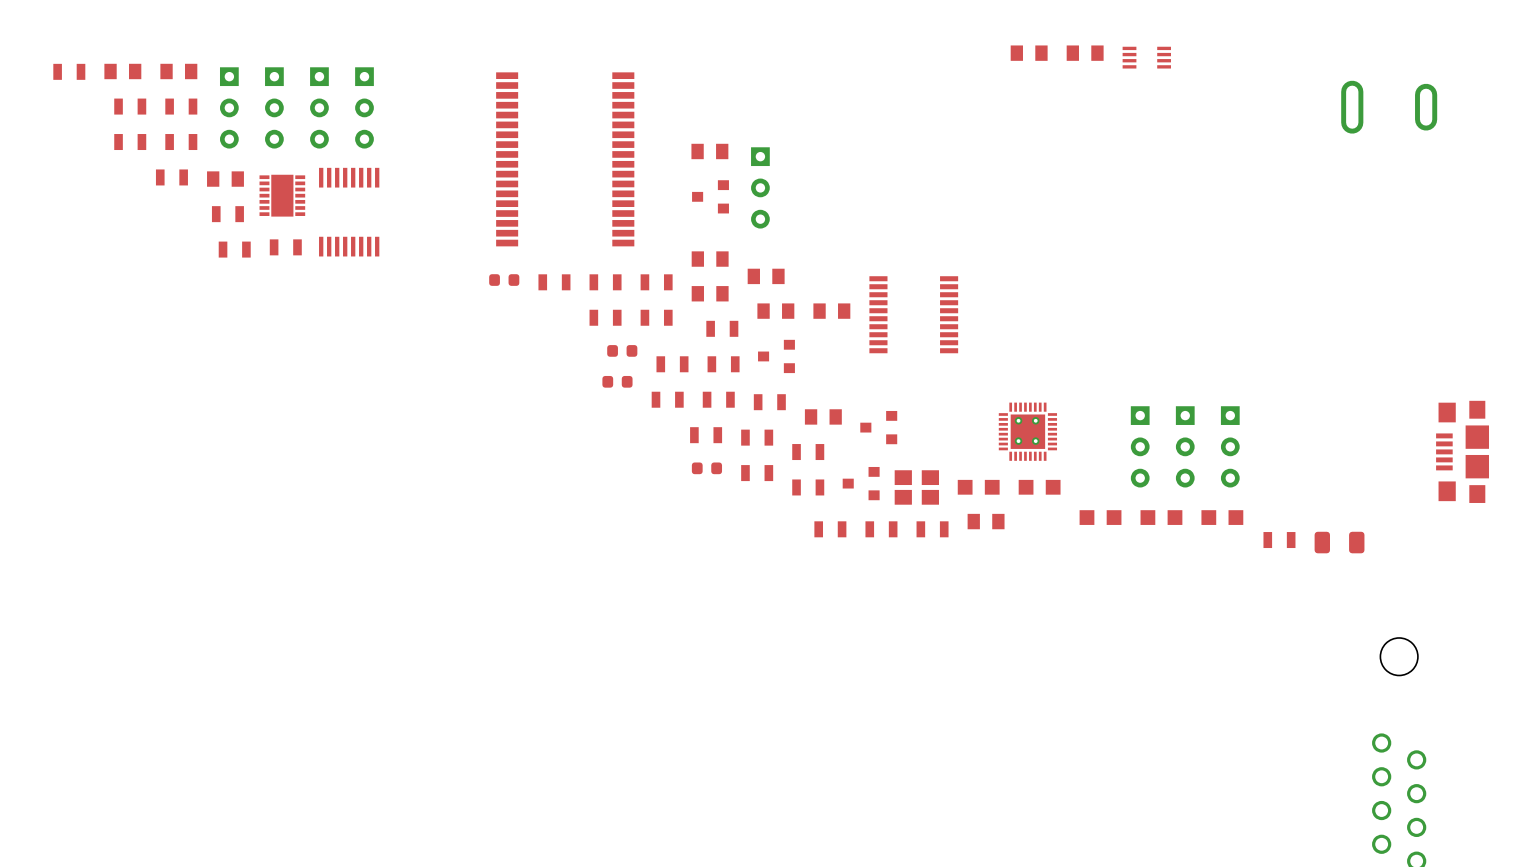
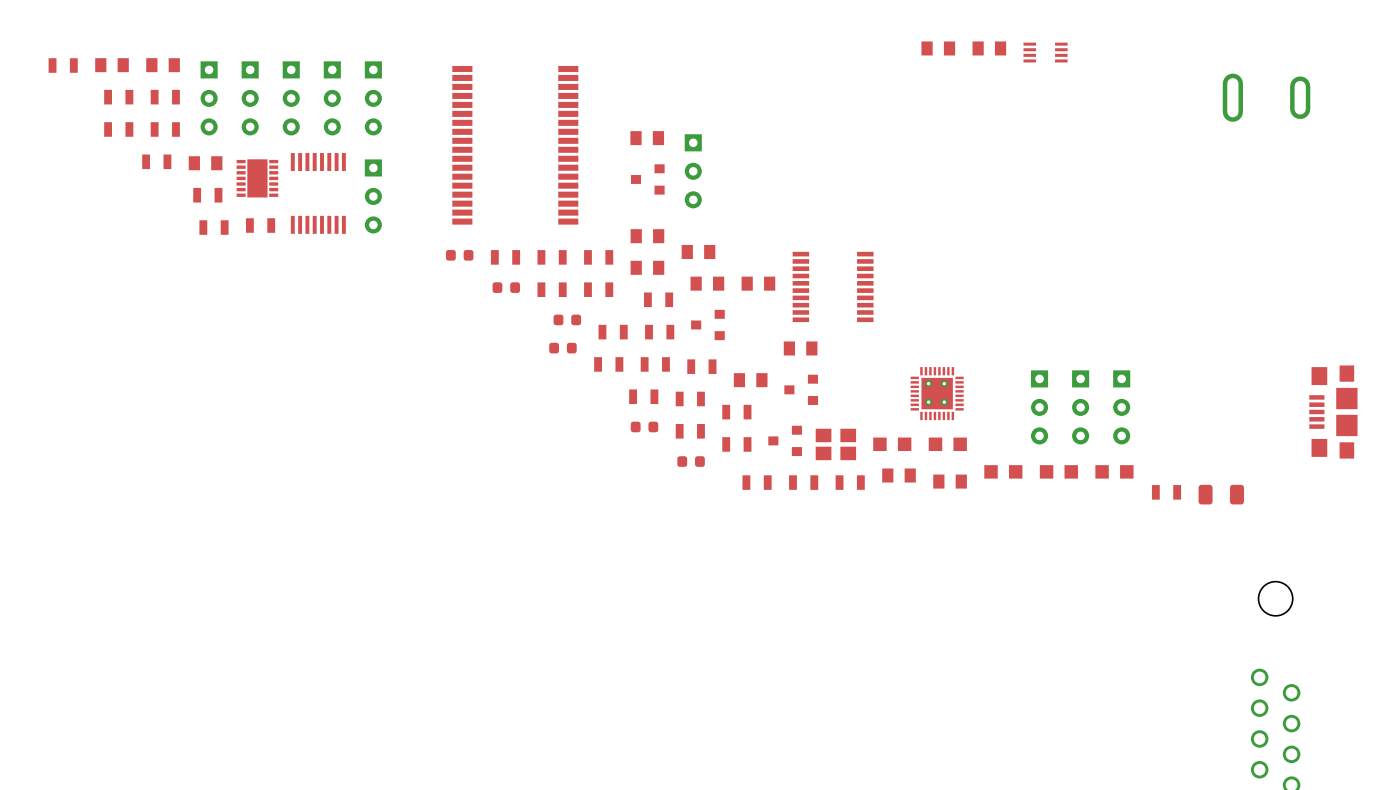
part: none -> (373, 98)
part: none -> (373, 196)
part: none -> (506, 287)
part: none -> (800, 348)
part: none -> (691, 461)
part: none -> (950, 481)

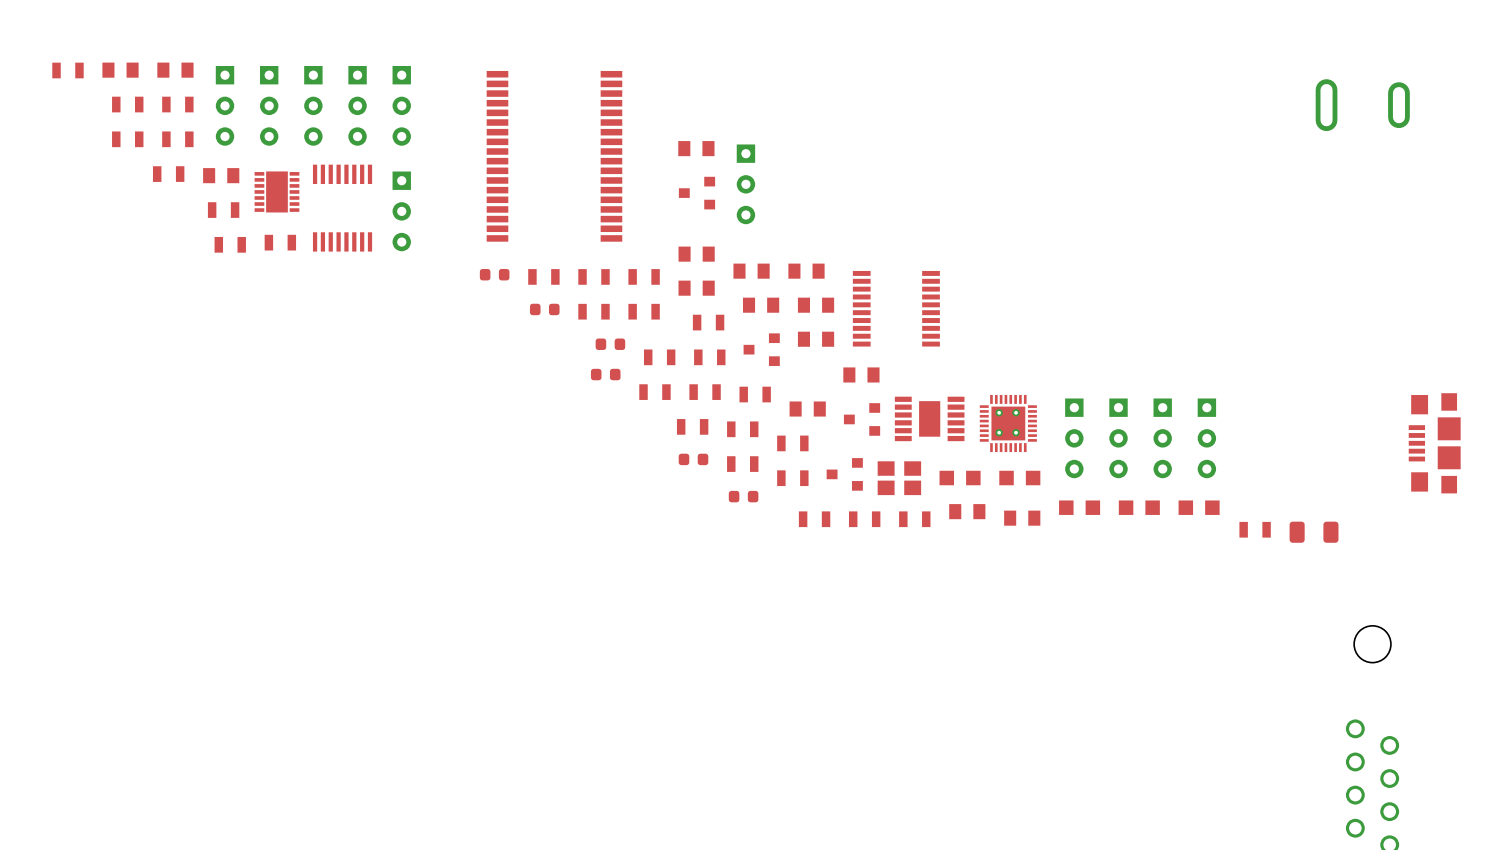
part: (938, 48) -> none
part: (989, 48) -> none
part: (1045, 52) -> none
part: none -> (806, 271)
part: none -> (816, 339)
part: none -> (929, 418)
part: none -> (1074, 438)

